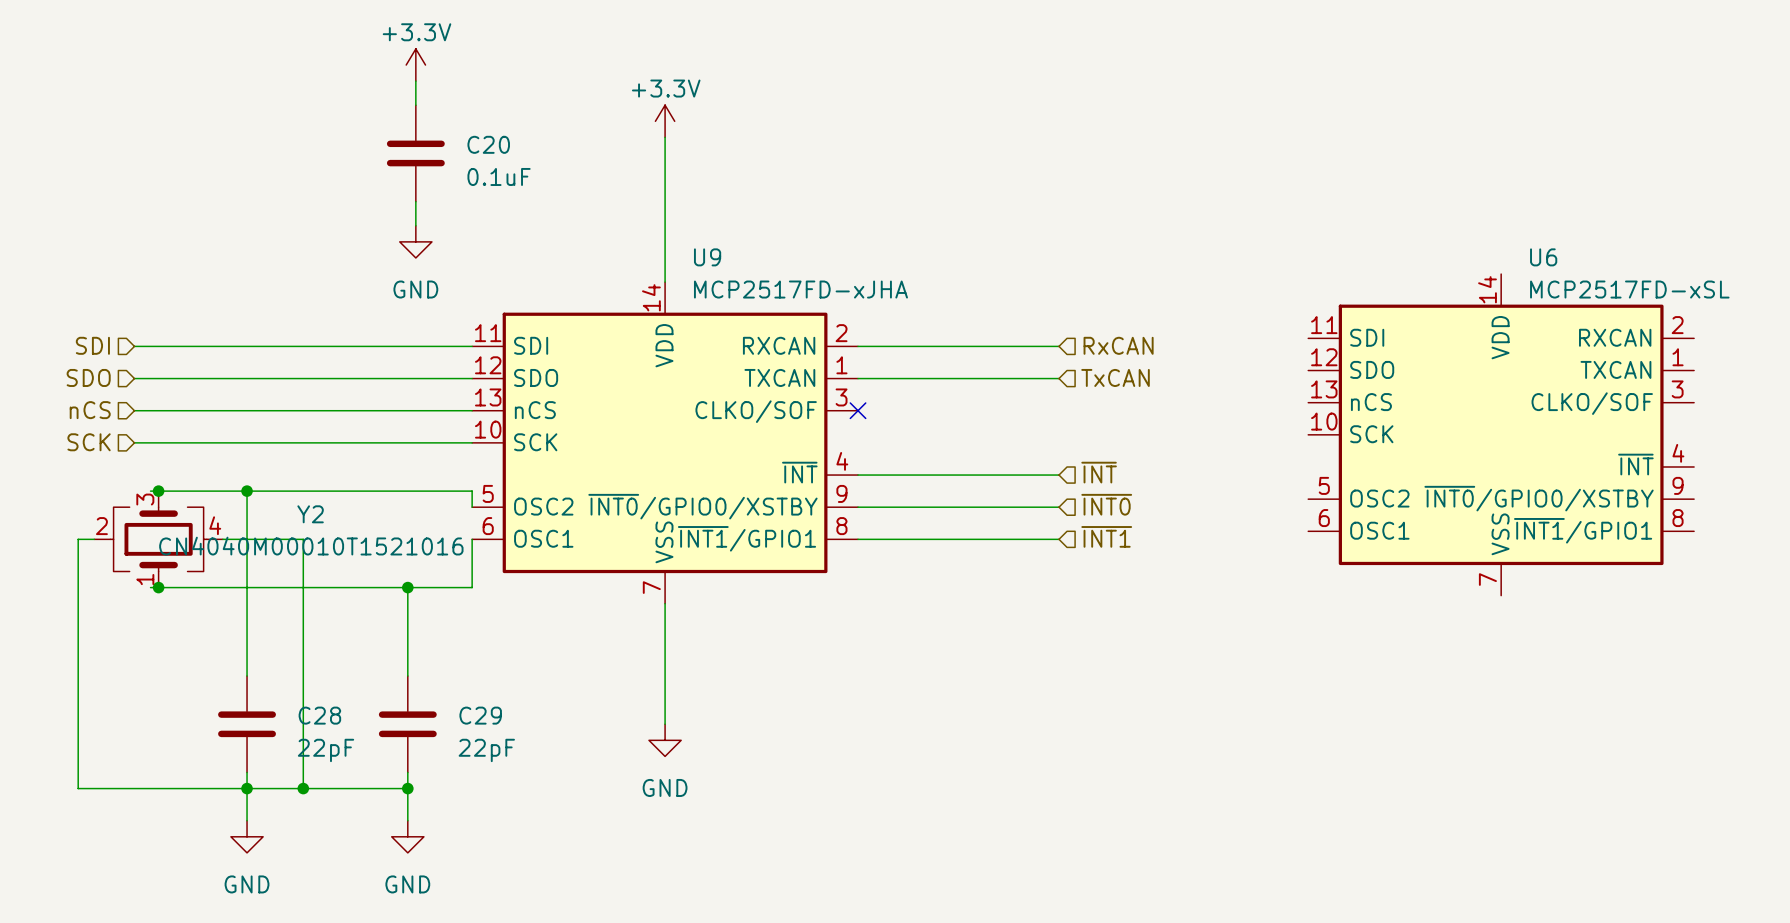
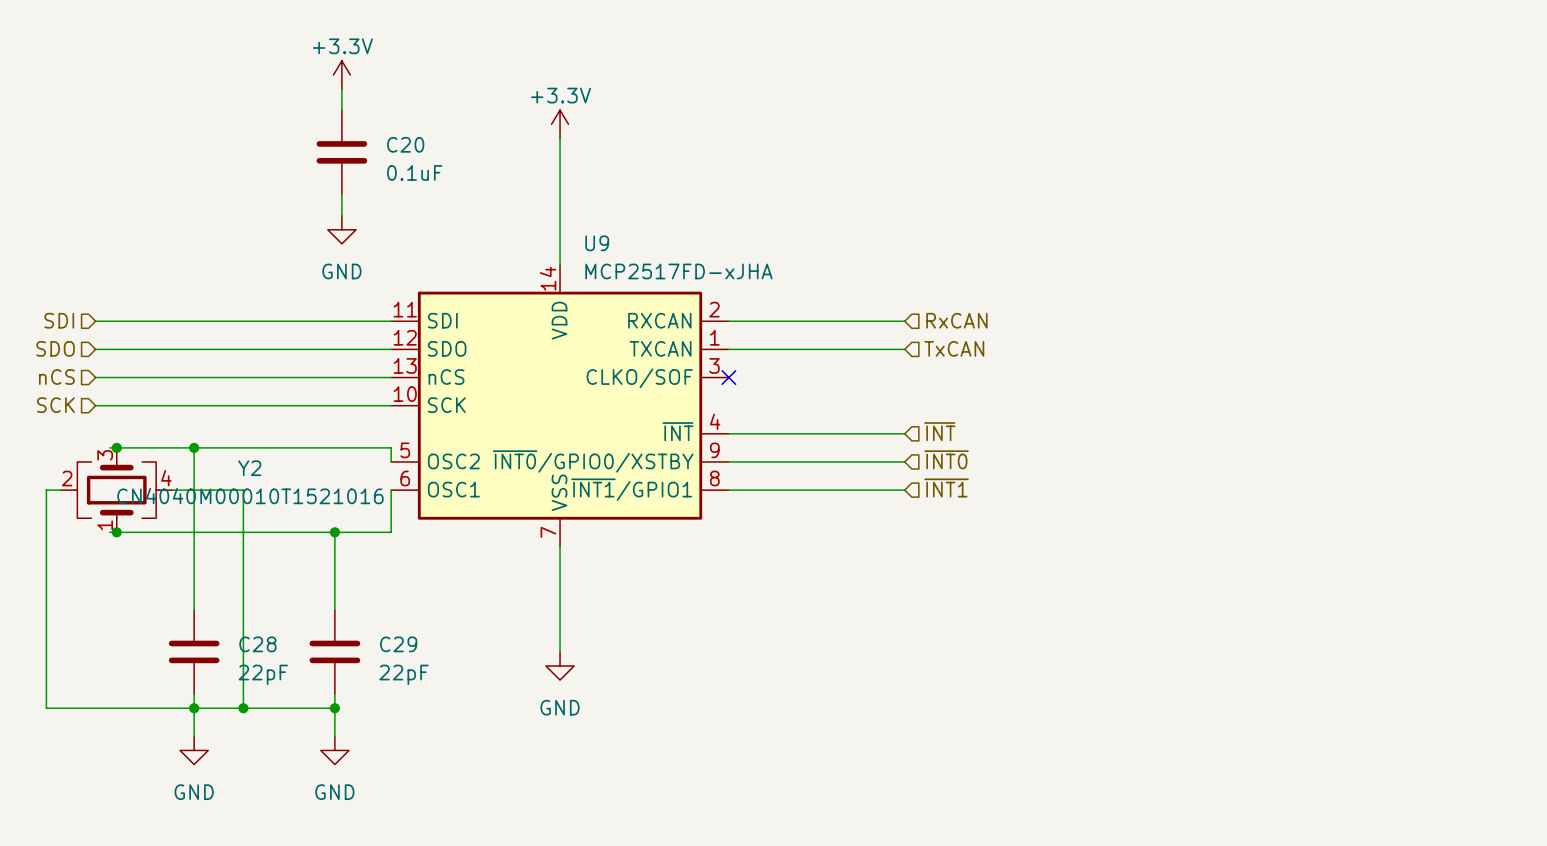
U6: MCP2517FD-xSL (1501, 434) -> none

